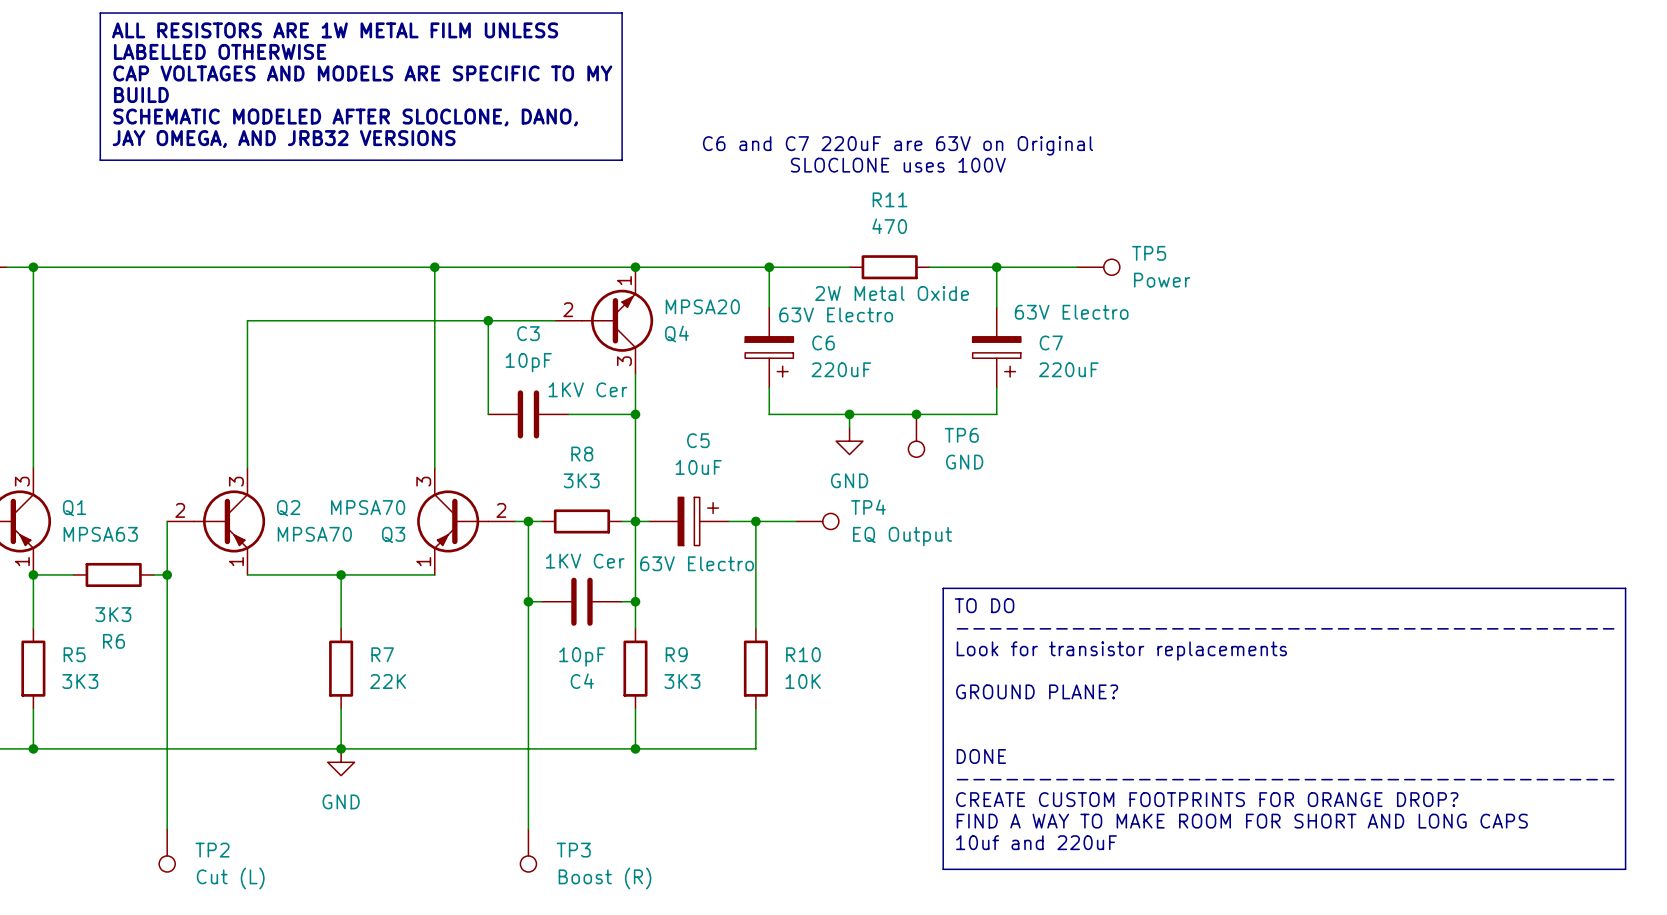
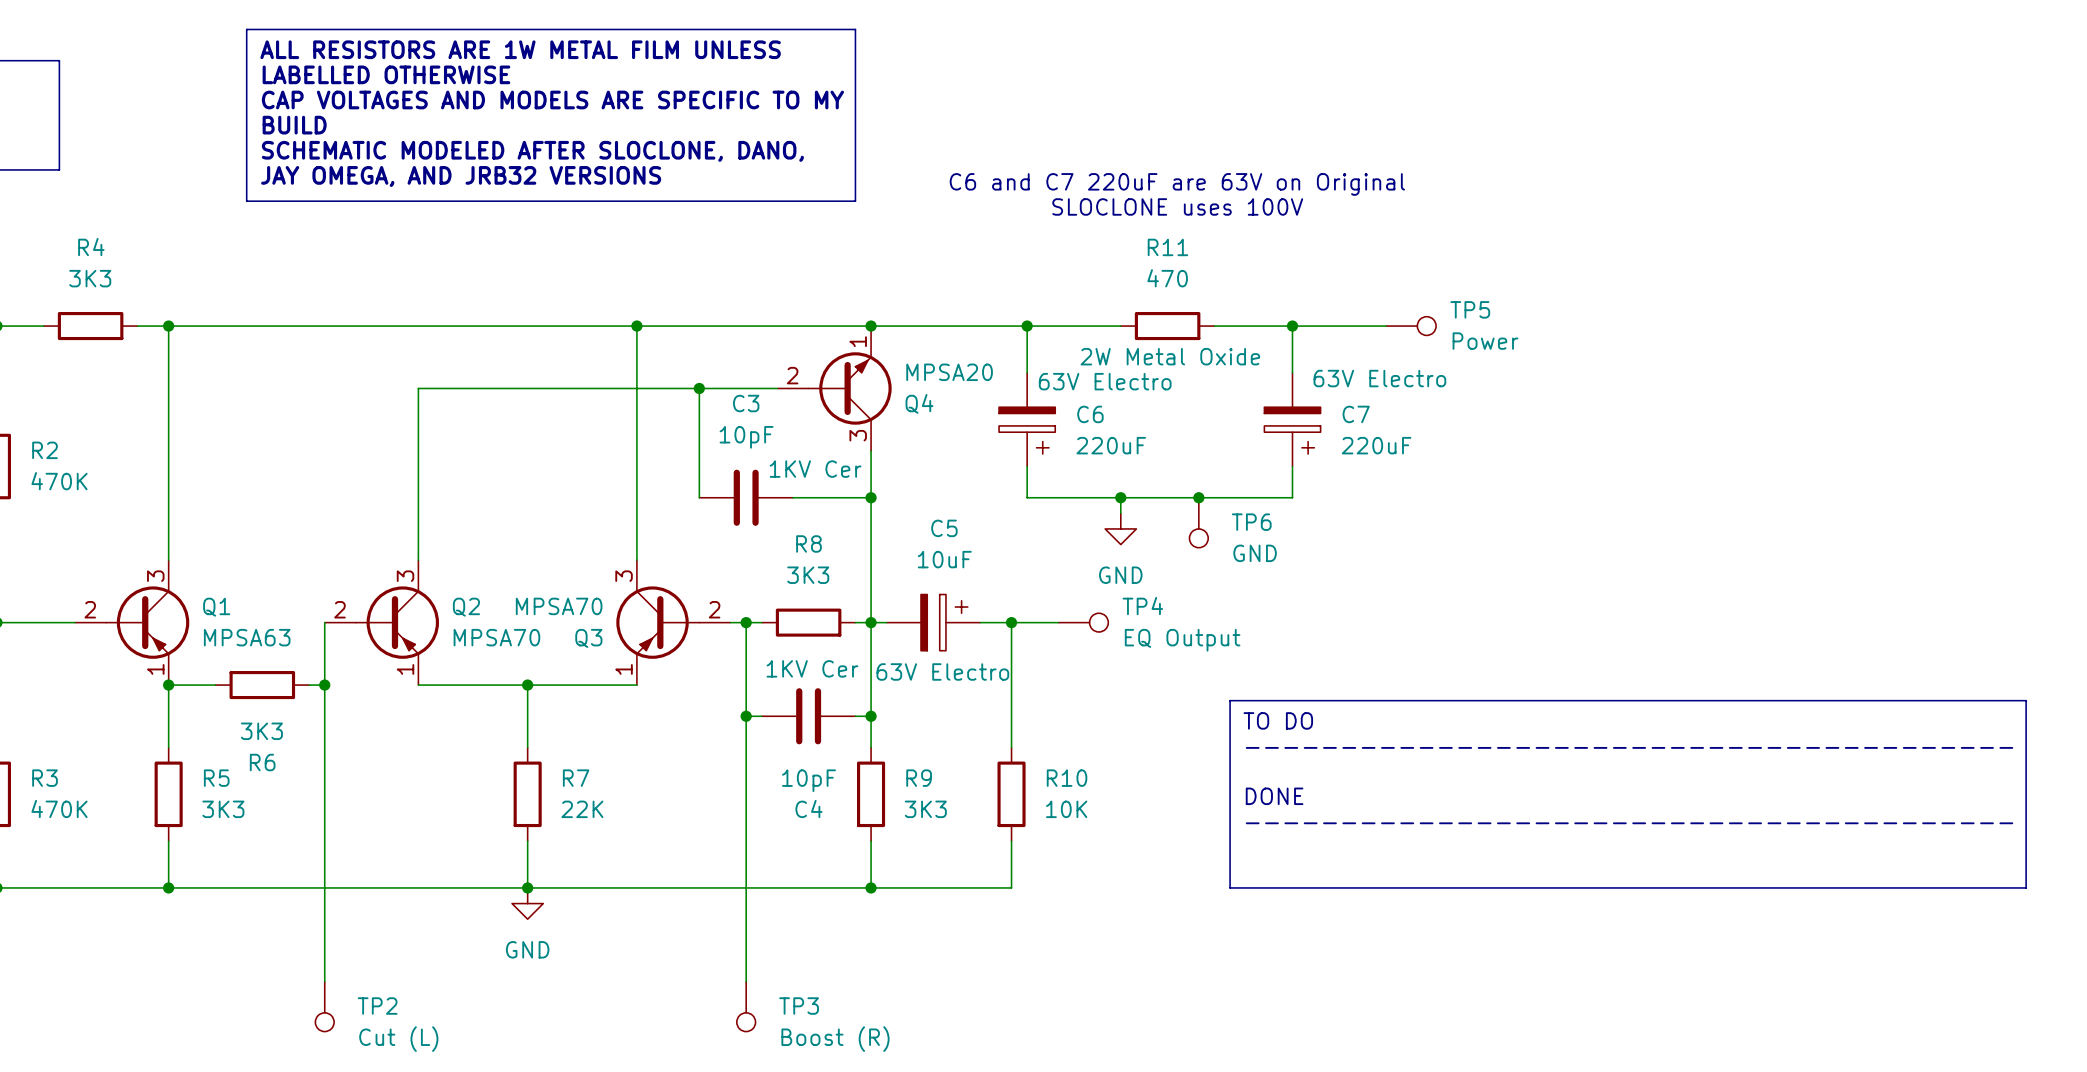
text: Look for transistor replacements (1121, 651) -> none
text: GROUND PLANE? (1037, 691) -> ---------------------------------------- (1629, 823)
line: (943, 748) (943, 869) (1625, 869) (1625, 748) -> (1230, 887) (2026, 887)
text position: DONE (981, 756) -> DONE (1274, 796)
text: ---------------------------------------- (1285, 779) -> none
text: CREATE CUSTOM FOOTPRINTS FOR ORANGE DROP? (1207, 799) -> none
text: FIND A WAY TO MAKE ROOM FOR SHORT AND LONG CAPS (1242, 821) -> none
text: 10uf and 220uF (1036, 842) -> none

